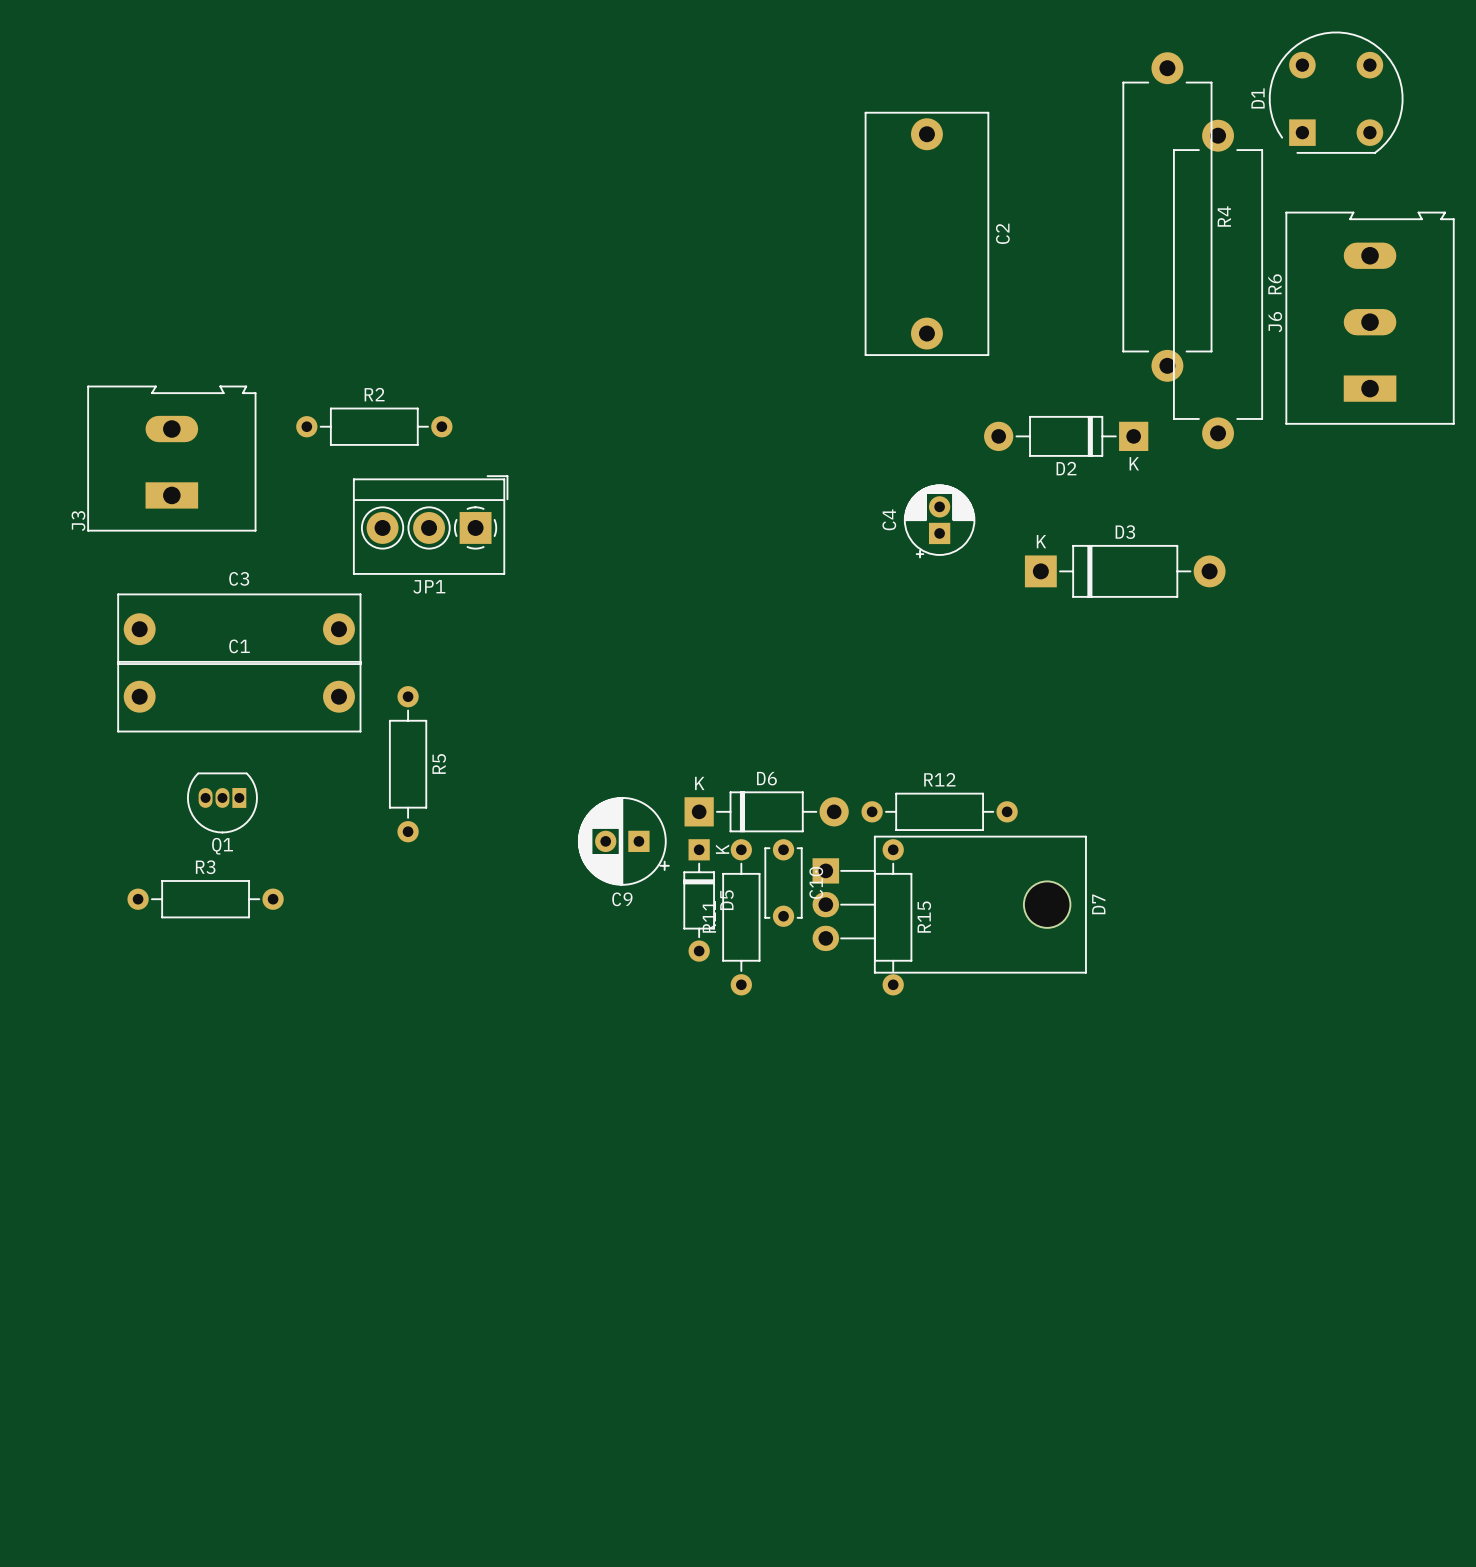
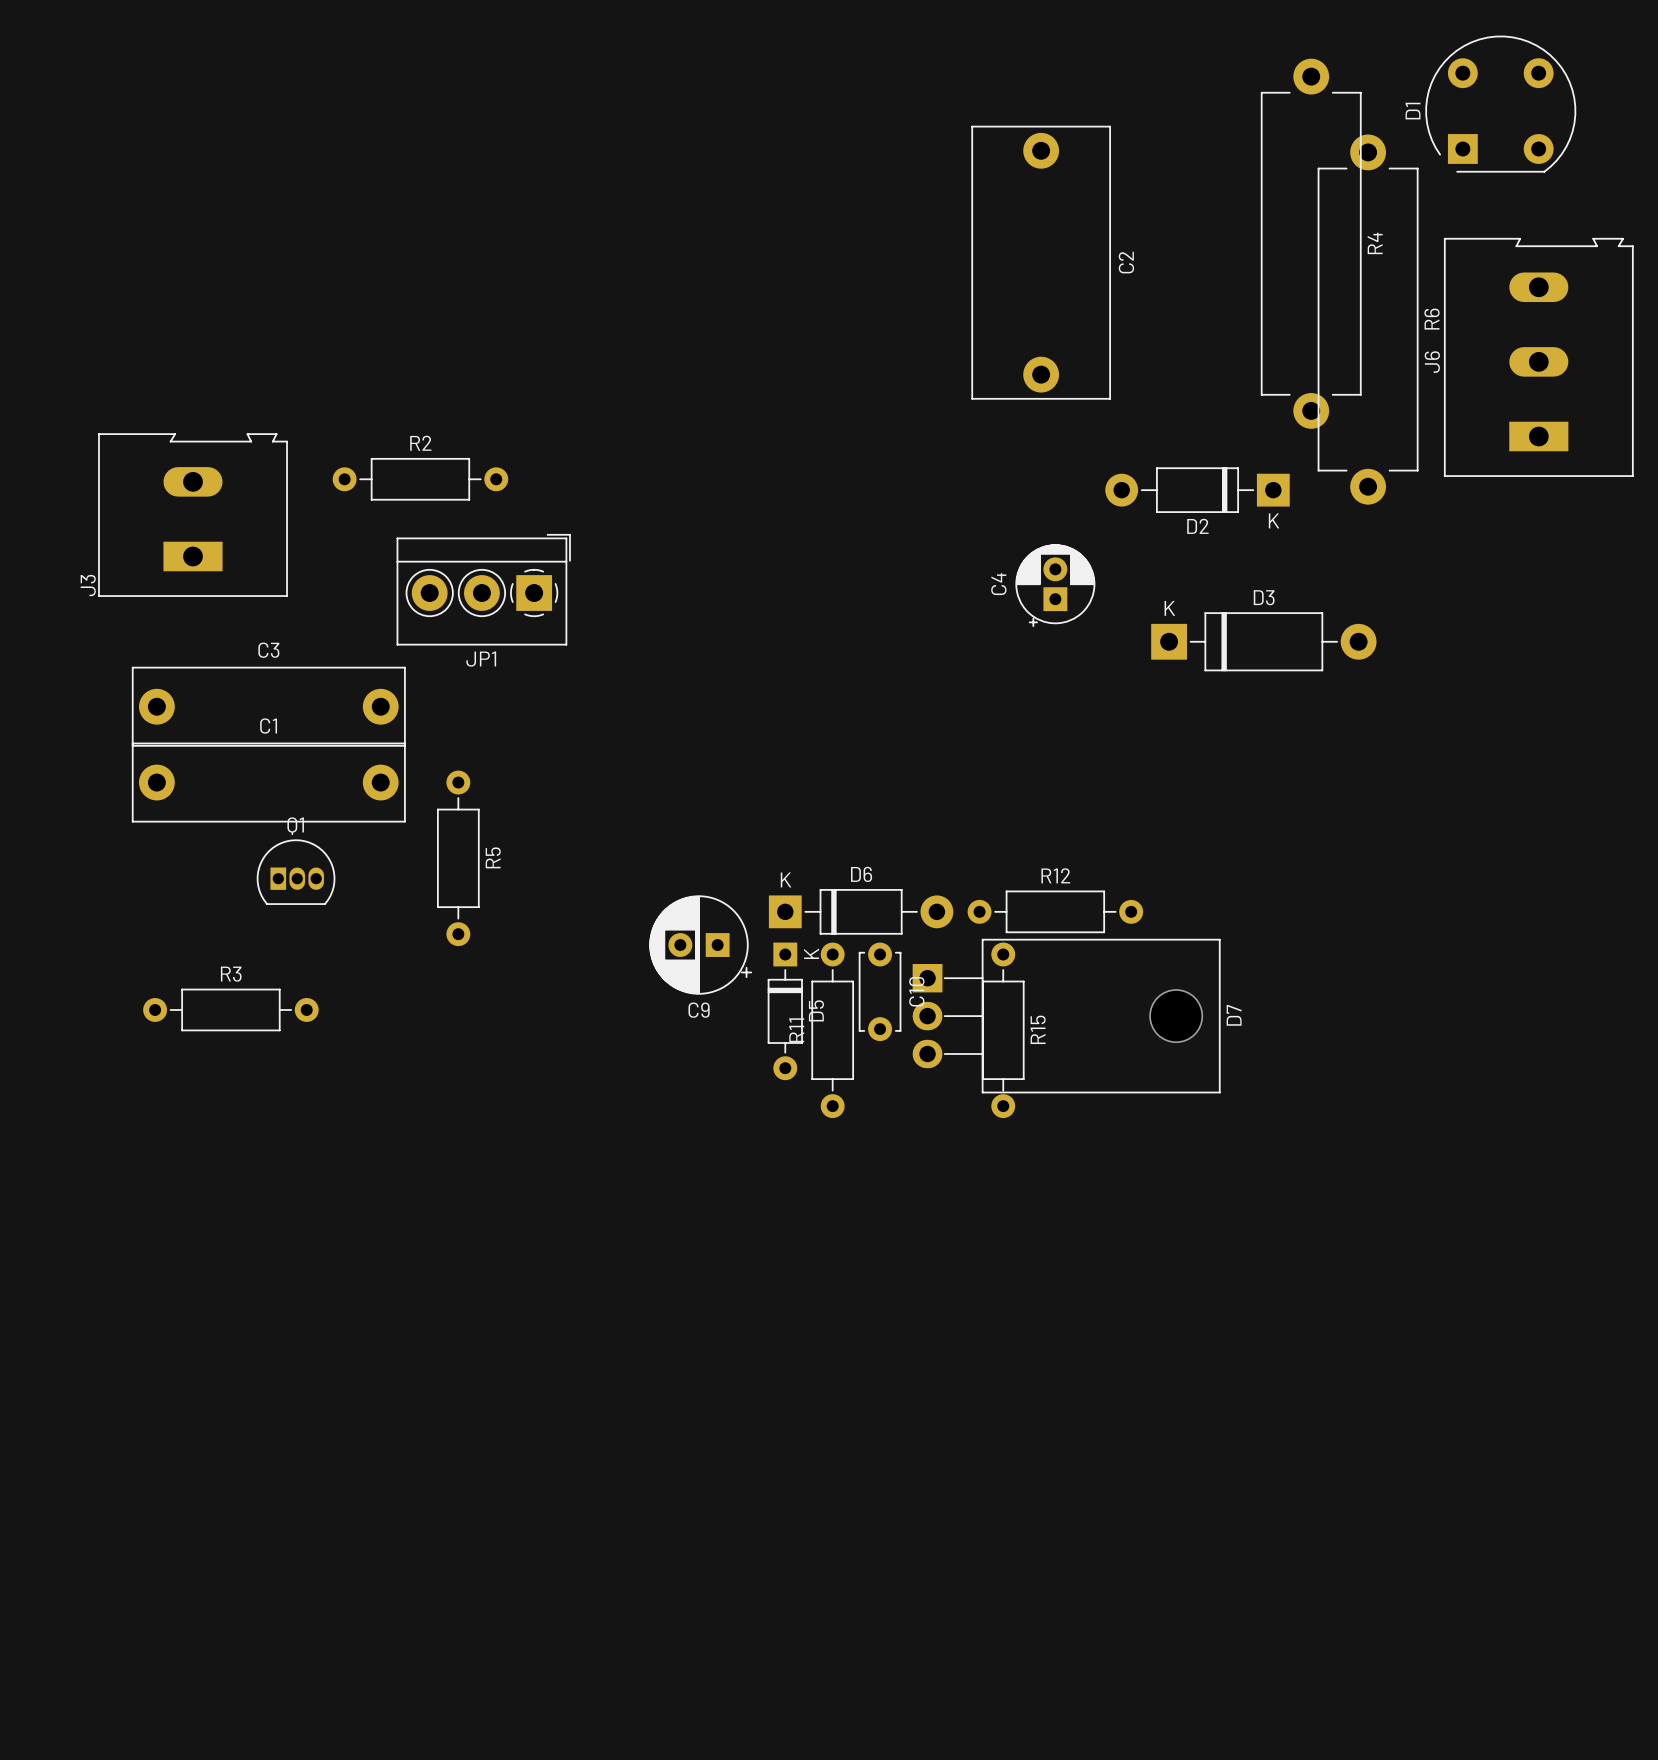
Q1 footprint: [187, 772, 258, 834] -> [256, 839, 336, 905]
Q1 name position: Q1 (222, 846) -> Q1 (295, 826)

